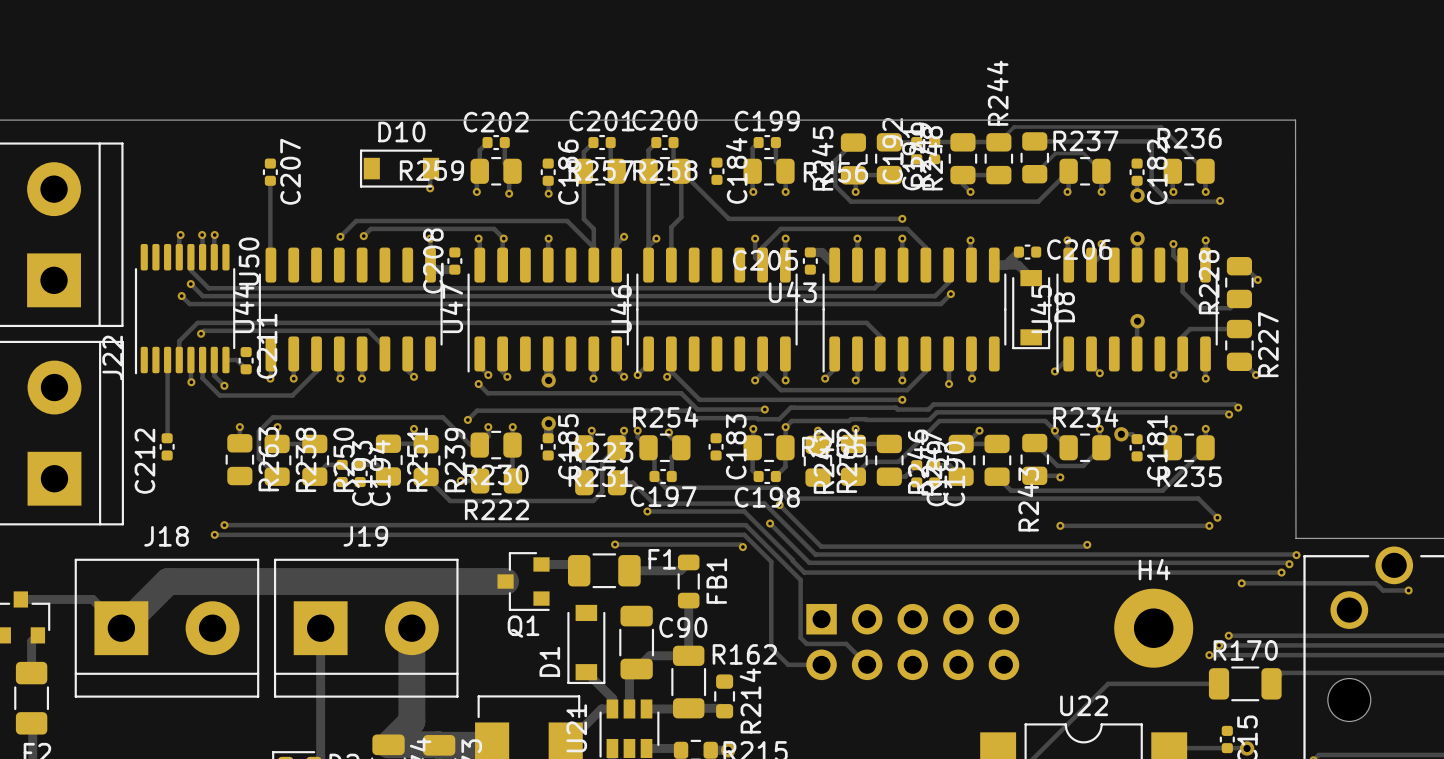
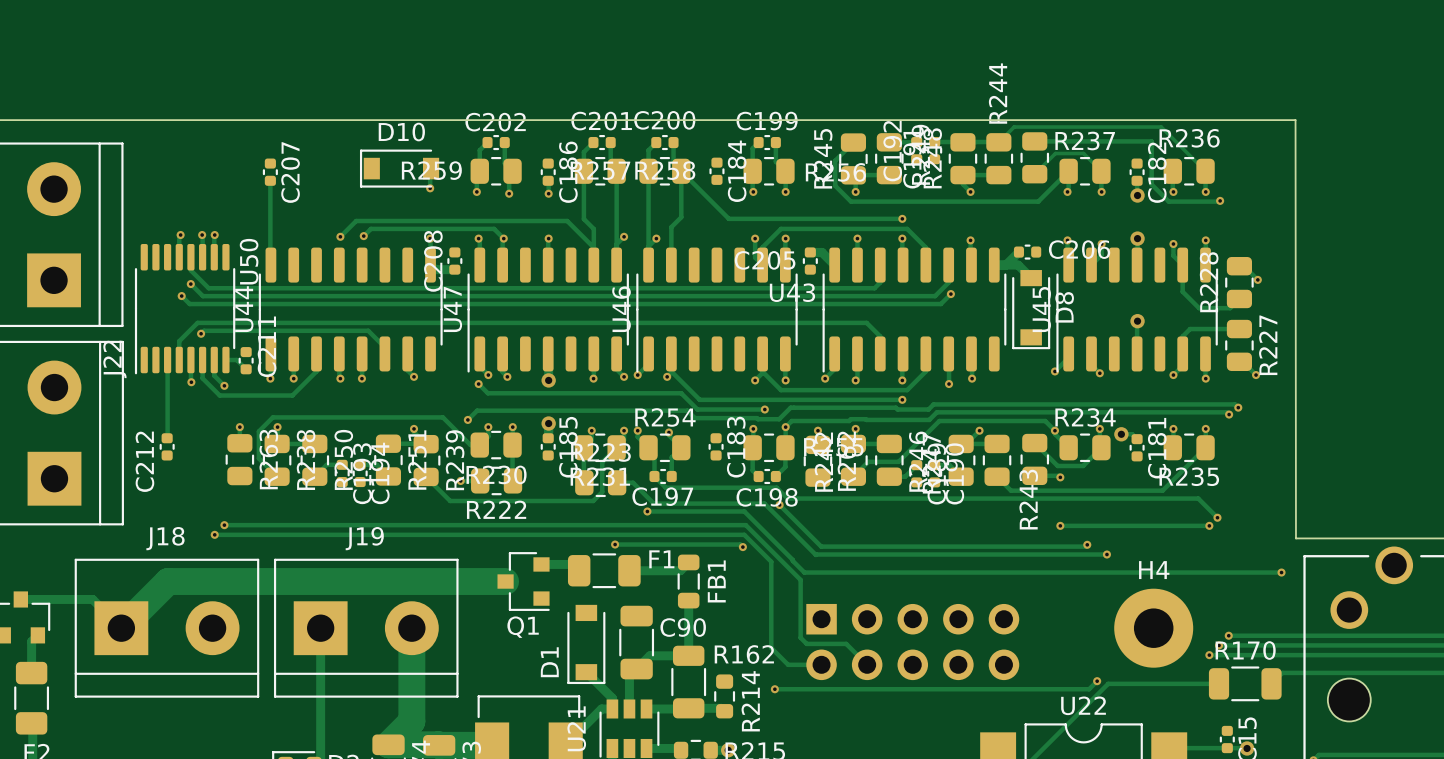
track: (770, 523) (809, 562) (1289, 564) -> none
via: (770, 523) -> none
track: (1106, 554) (1296, 555) -> none
via: none -> (1106, 554)
via: (1296, 555) -> none
via: (1289, 564) -> none
track: (1241, 583) (1375, 583) (1383, 590) (1408, 590) -> none
via: (1241, 583) -> none
via: (1408, 590) -> none
track: none -> (1097, 681) (1089, 689) (774, 689)
via: none -> (1097, 681)
via: none -> (774, 689)

